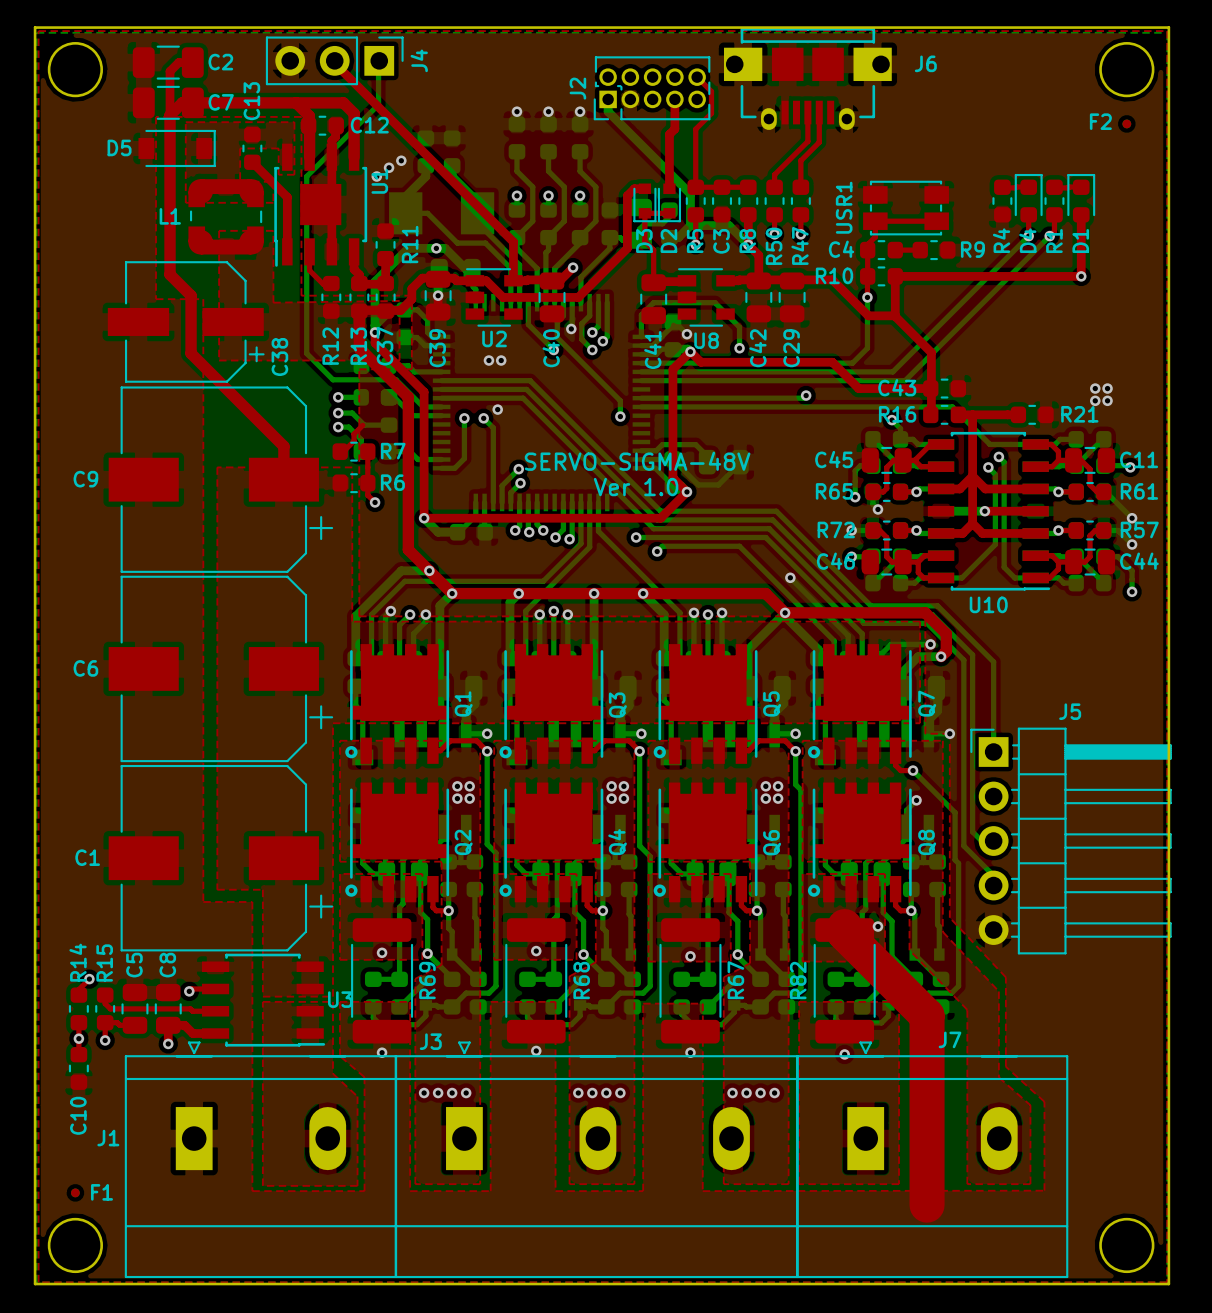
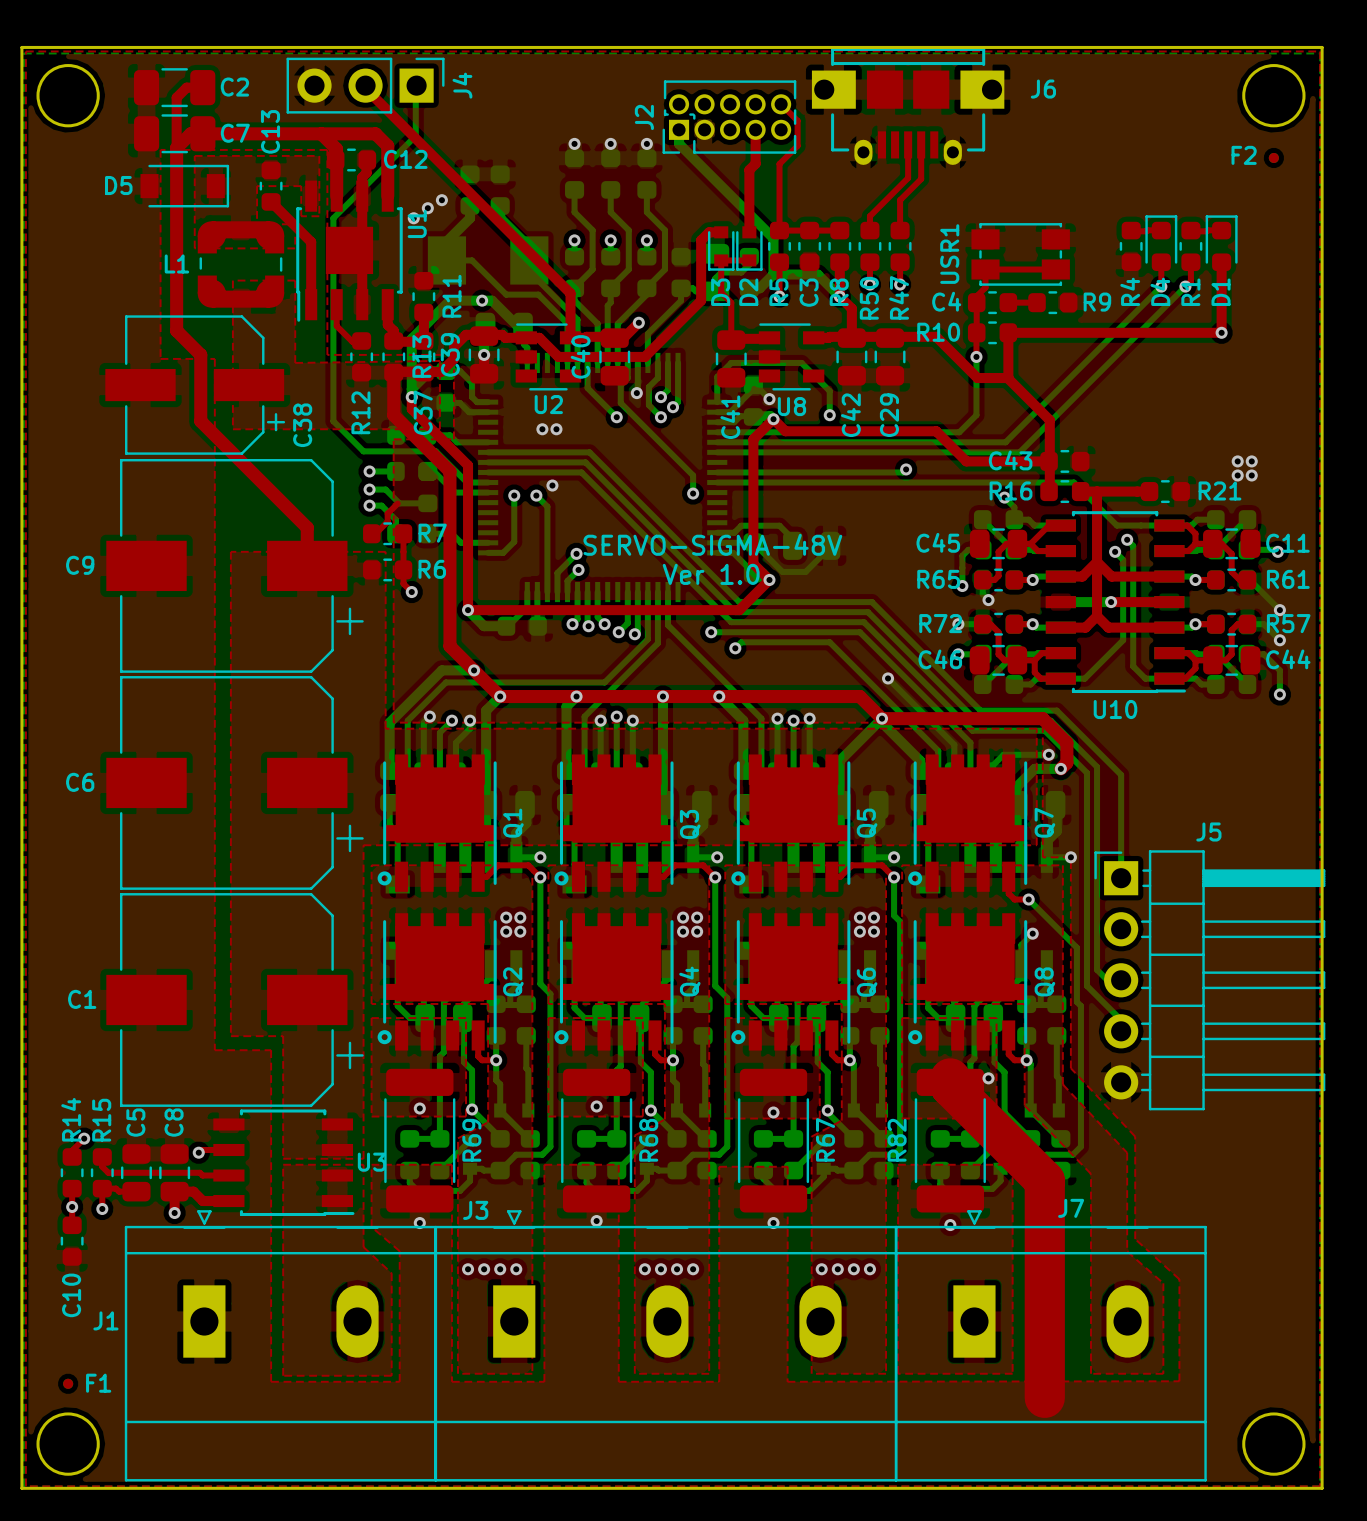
R13 name position: R13 (358, 346) -> R13 (421, 356)
C39 name position: C39 (437, 348) -> C39 (450, 354)
C40 name position: C40 (551, 348) -> C40 (580, 356)

